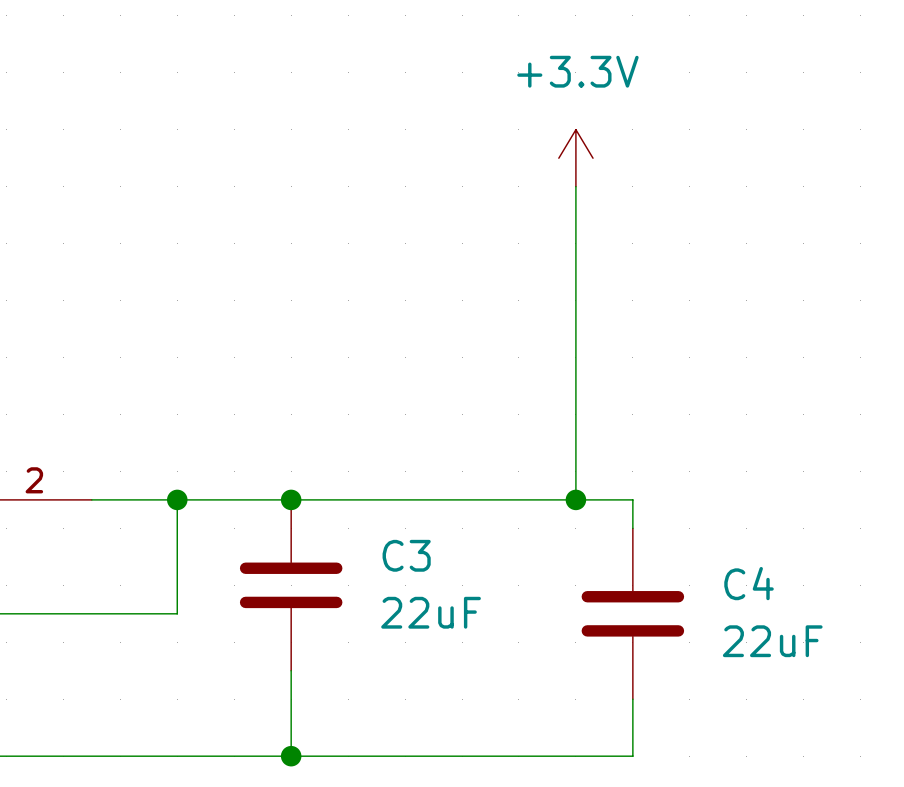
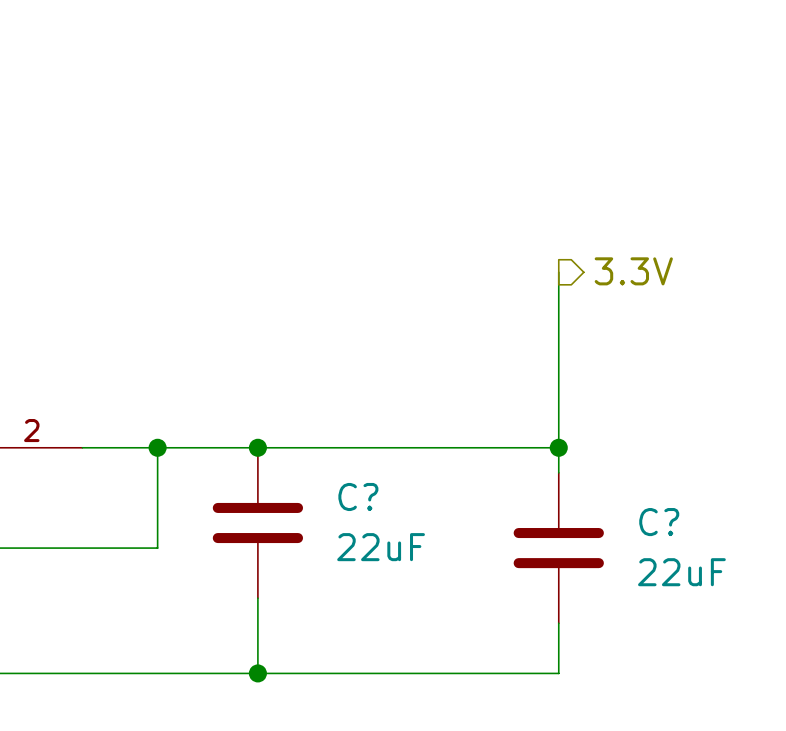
power symbol: +3.3V (575, 158) -> none
wire: (575, 186) (575, 499) -> none
hierarchical label: none -> 3.3V (633, 271)
wire: none -> (558, 272) (558, 447)
junction position: (575, 499) -> (558, 447)
C3 name: C3 (406, 555) -> C? (358, 496)
C4 name: C4 (749, 583) -> C? (659, 522)

